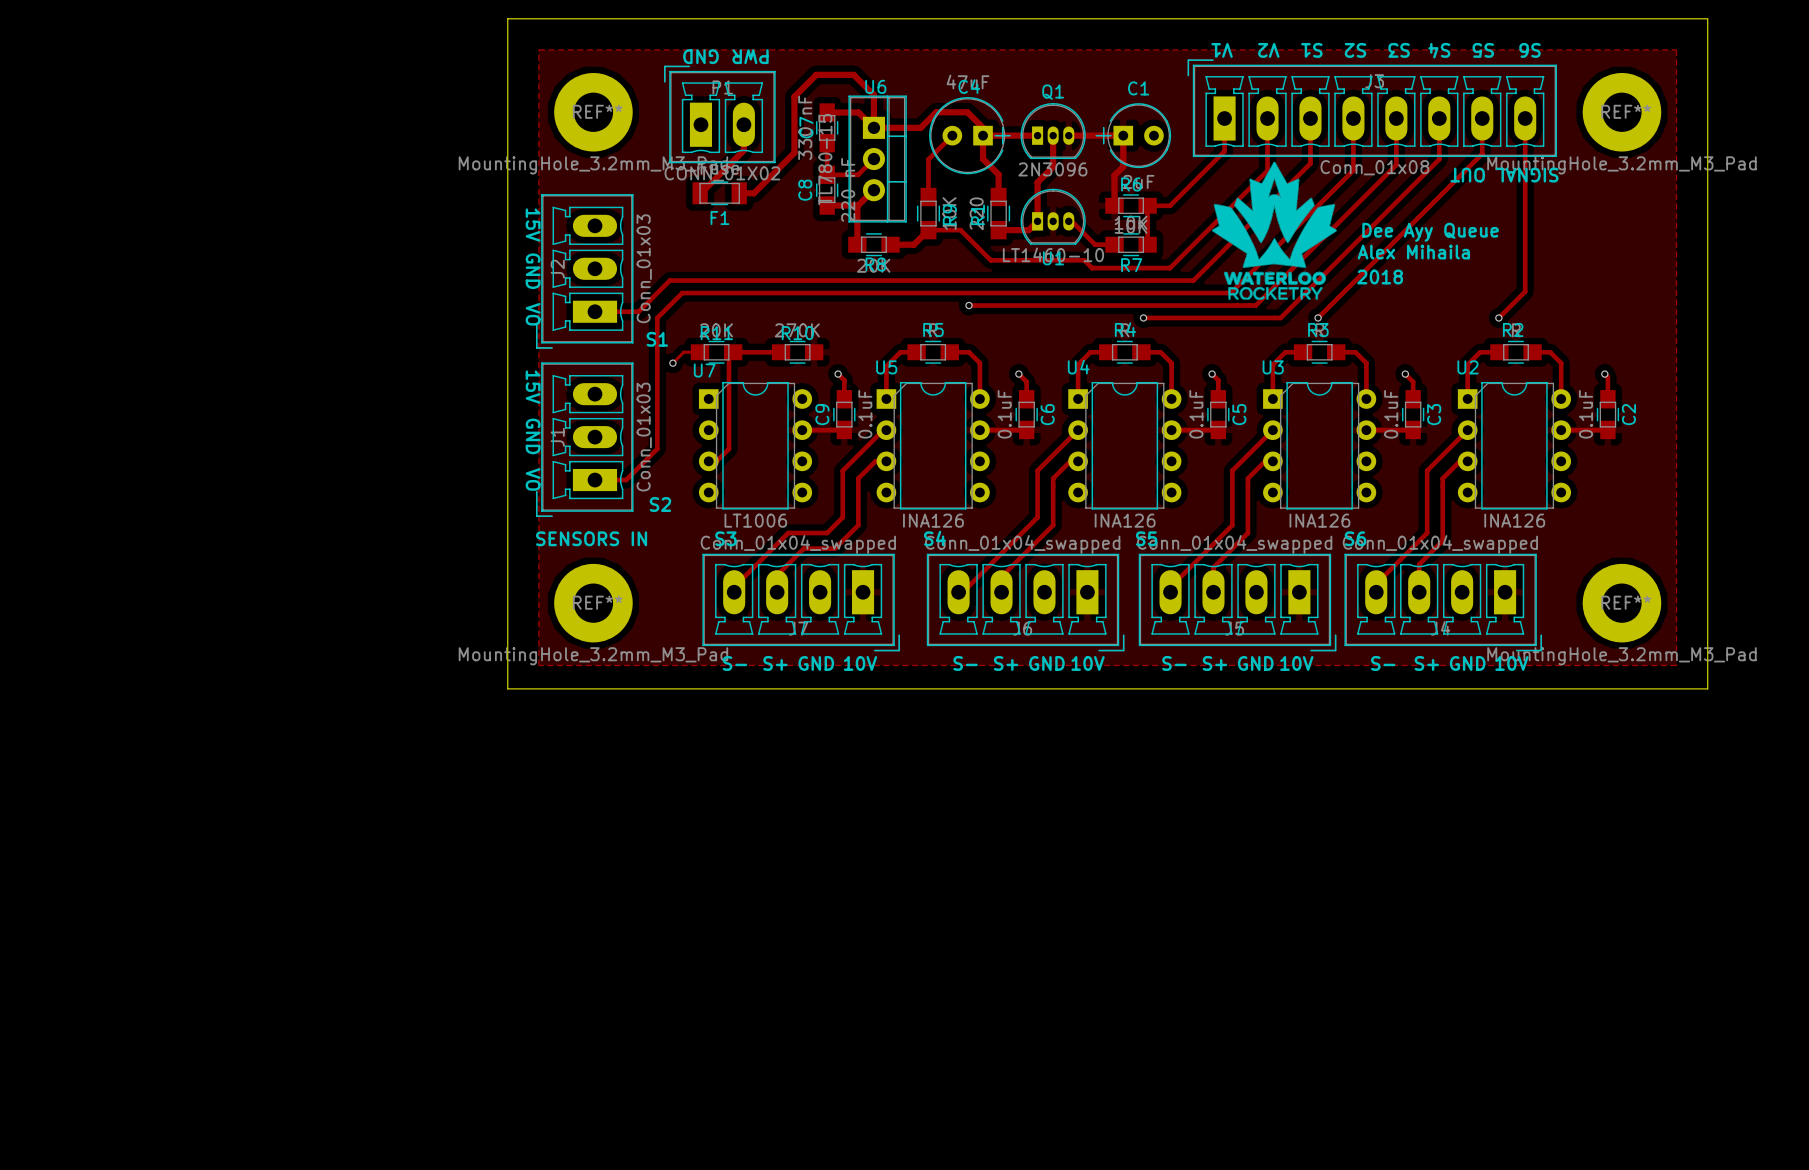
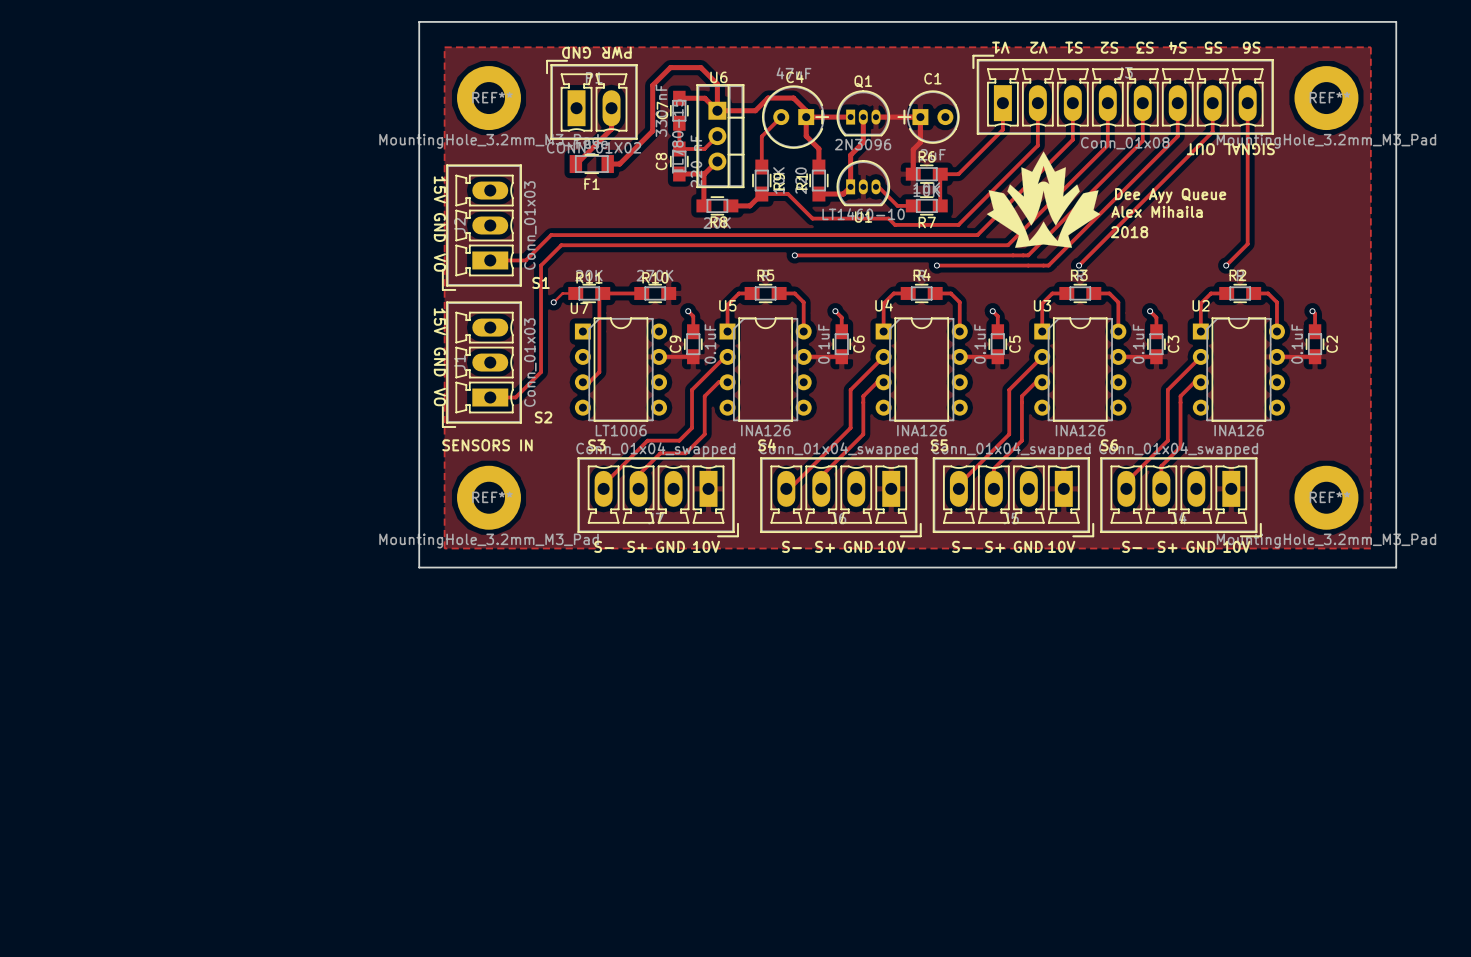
drawing shape: [1212, 161, 1337, 300] -> [986, 151, 1101, 248]

